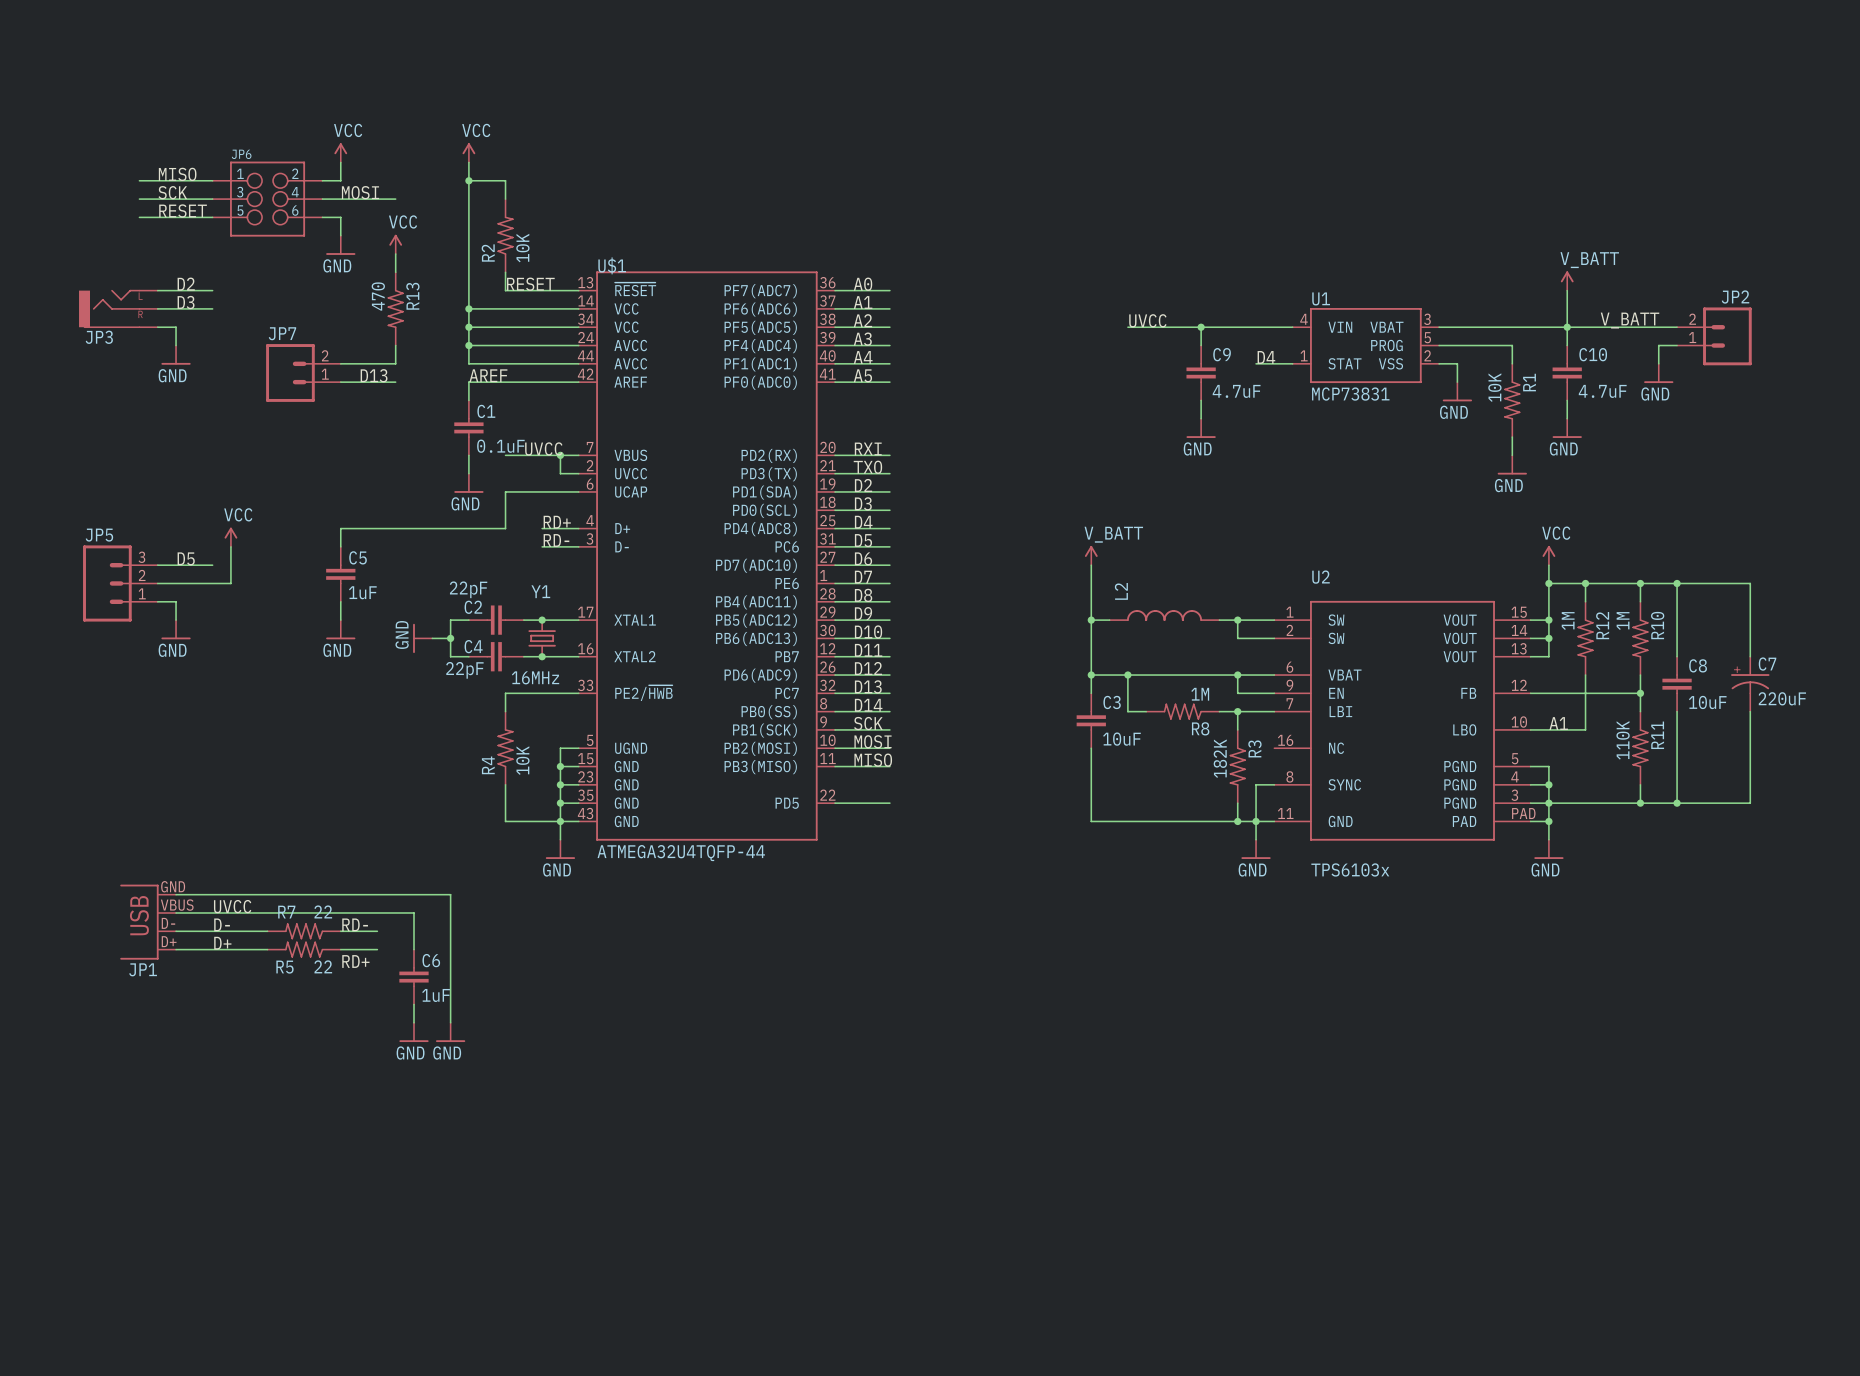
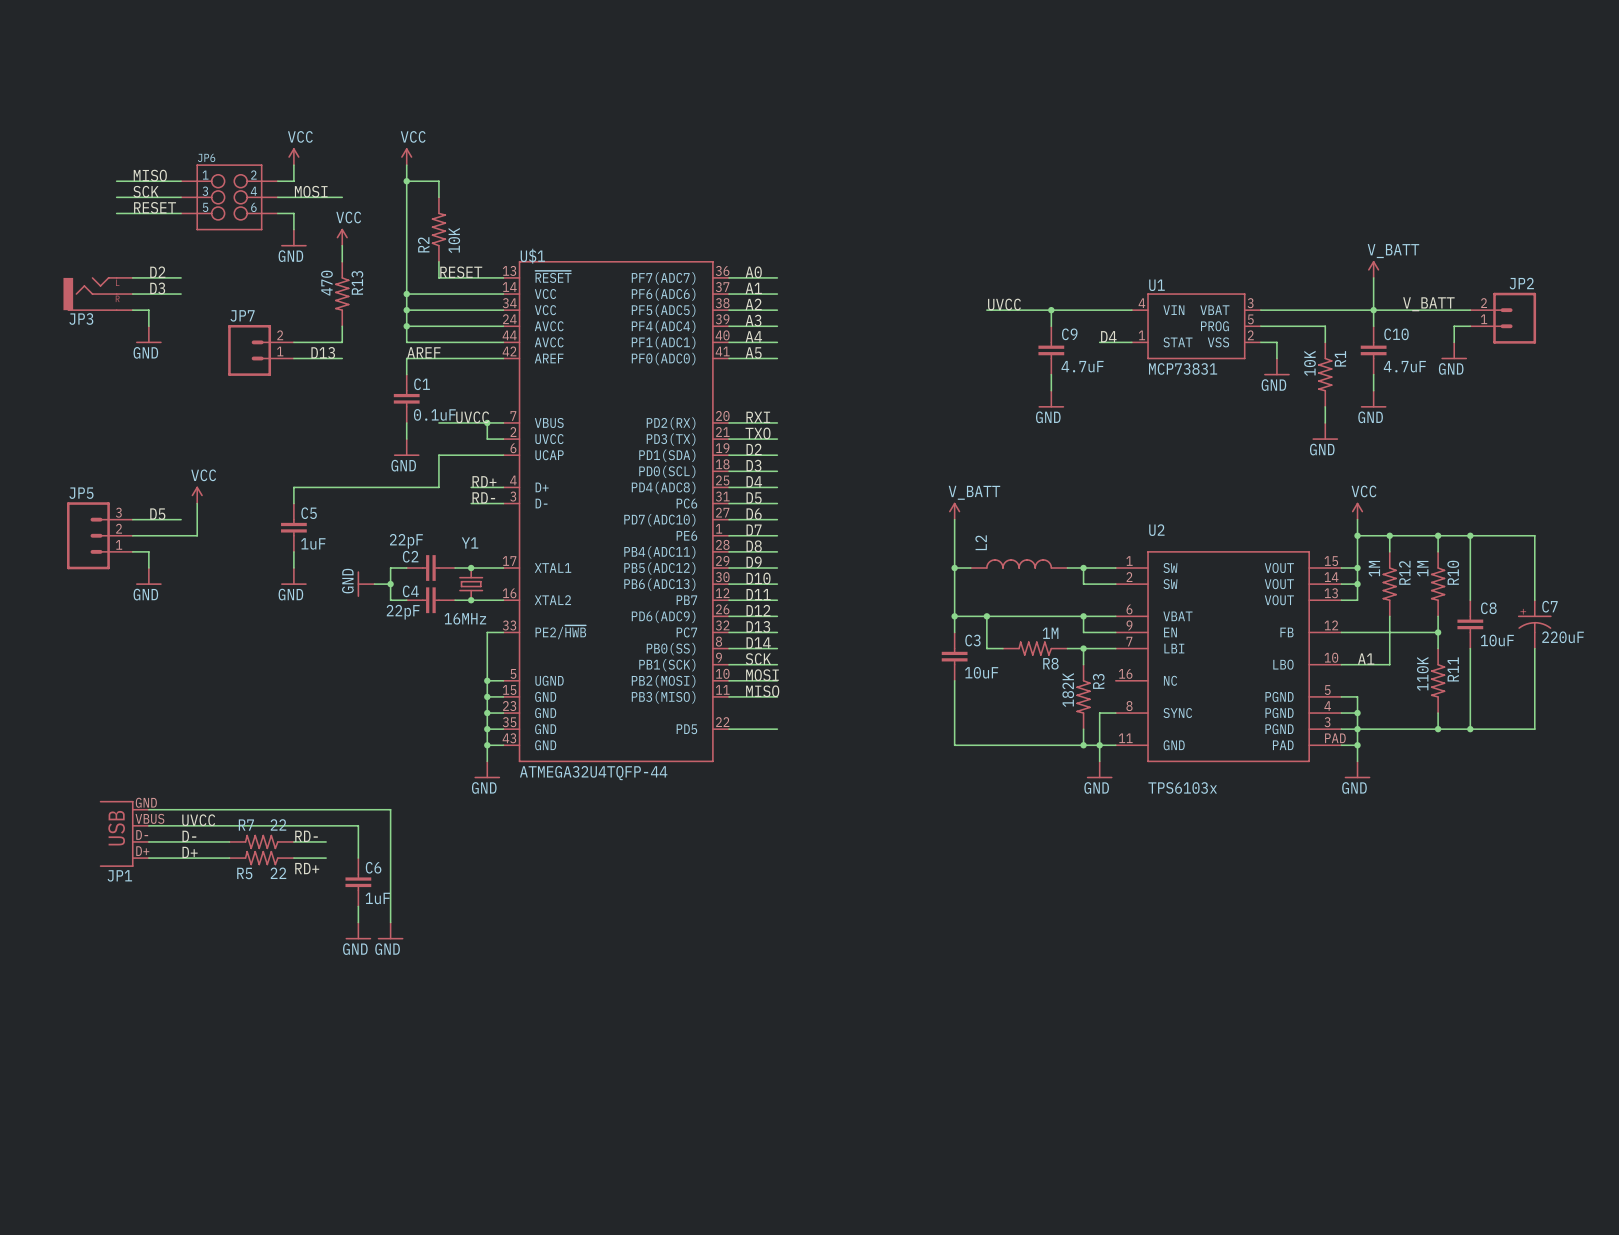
wire: (560, 693) (505, 693) (505, 711) -> (487, 632) (487, 680)
R4: 10K (505, 748) -> none
junction: none -> (487, 680)
wire: (505, 784) (505, 821) (560, 821) -> none

